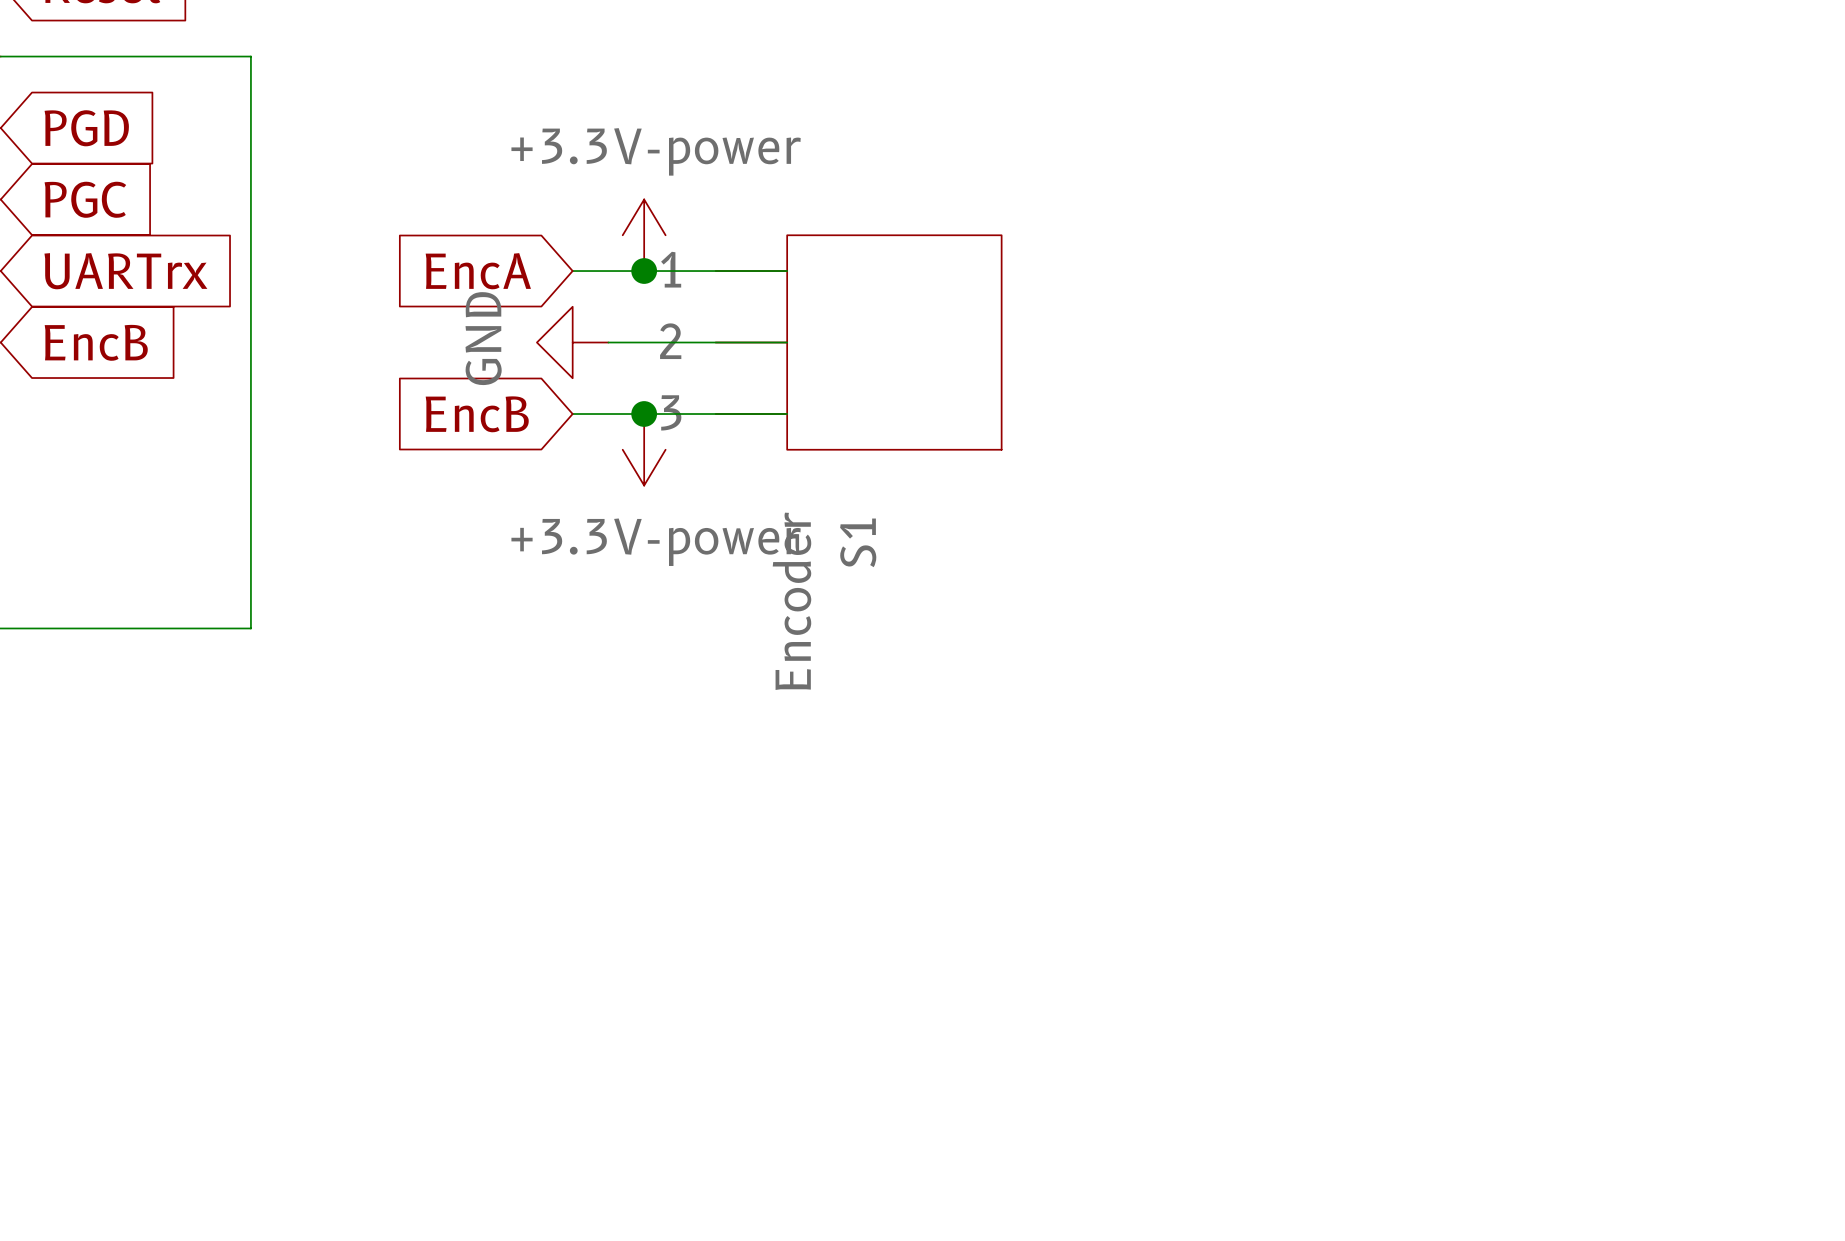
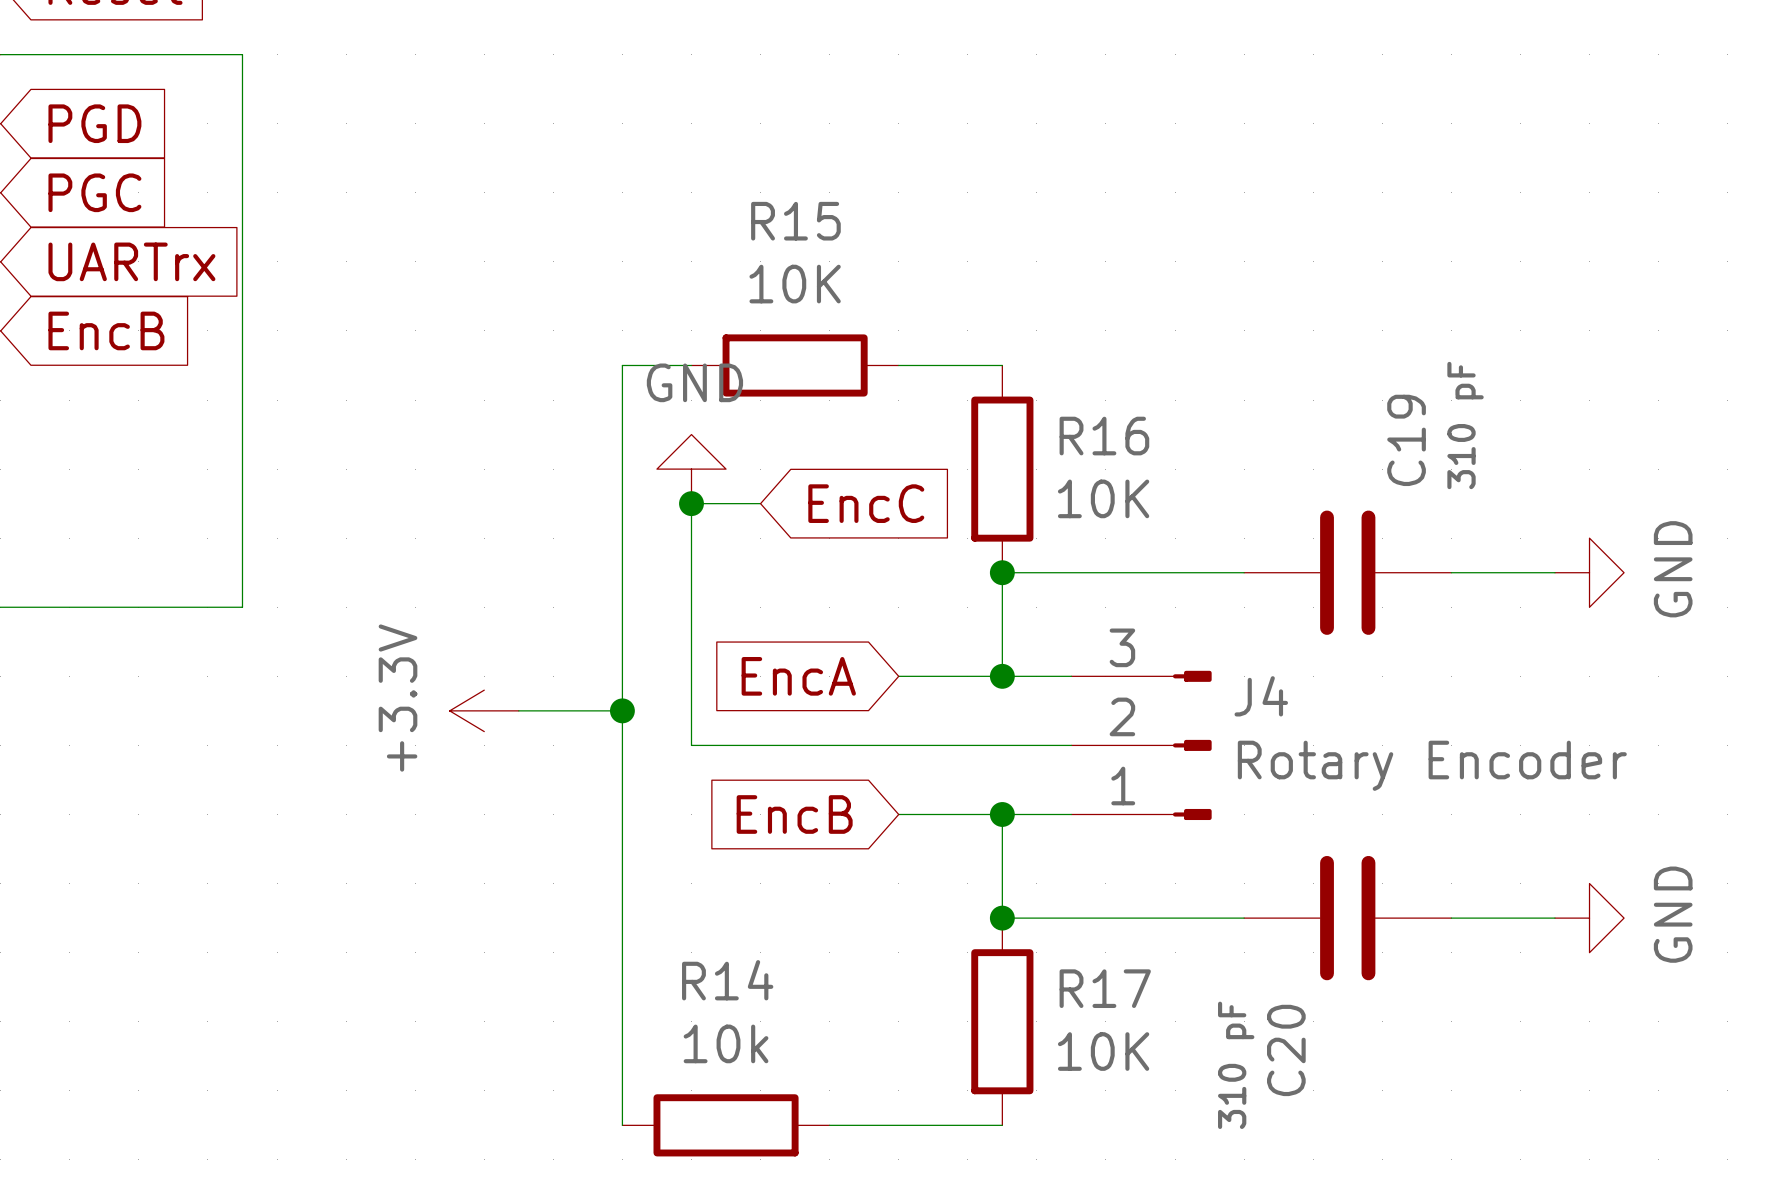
power symbol: +3.3V-power (644, 235) -> none
global label position: EncA (478, 271) -> EncA (798, 676)
wire: (572, 271) (787, 271) -> none
junction: (644, 271) -> none
power symbol rotation: 0° (572, 342) -> 90° clockwise (691, 469)
power symbol position: GND (572, 342) -> GND (691, 469)
wire: (608, 342) (787, 342) -> (898, 676) (1071, 676)
S1: Encoder (858, 342) -> none
wire: none -> (691, 365) (622, 365) (622, 1125)
R15: none -> 10K (795, 365)
wire: none -> (898, 365) (1002, 365)
global label position: EncB (477, 414) -> EncB (794, 814)
wire: (572, 414) (787, 414) -> none
junction position: (644, 414) -> (691, 503)
power symbol: +3.3V-power (644, 449) -> none
R16: none -> 10K (1002, 469)
wire: none -> (760, 503) (691, 503) (691, 745) (1071, 745)
global label: none -> EncC (866, 503)
junction: none -> (1002, 572)
wire: none -> (1244, 572) (1002, 572) (1002, 676)
C19: none -> 310 pF (1347, 572)
wire: none -> (1451, 572) (1554, 572)
power symbol: none -> GND (1589, 572)
junction: none -> (1002, 676)
power symbol: none -> +3.3V (484, 710)
wire: none -> (518, 710) (622, 710)
junction: none -> (622, 710)
J4: none -> Rotary Encoder (1141, 745)
wire: none -> (898, 814) (1071, 814)
wire: none -> (1002, 814) (1002, 918) (1244, 918)
junction: none -> (1002, 814)
junction: none -> (1002, 918)
C20: none -> 310 pF (1347, 918)
wire: none -> (1451, 918) (1554, 918)
power symbol: none -> GND (1589, 918)
R17: none -> 10K (1002, 1021)
R14: none -> 10k (726, 1125)
wire: none -> (829, 1125) (1002, 1125)

